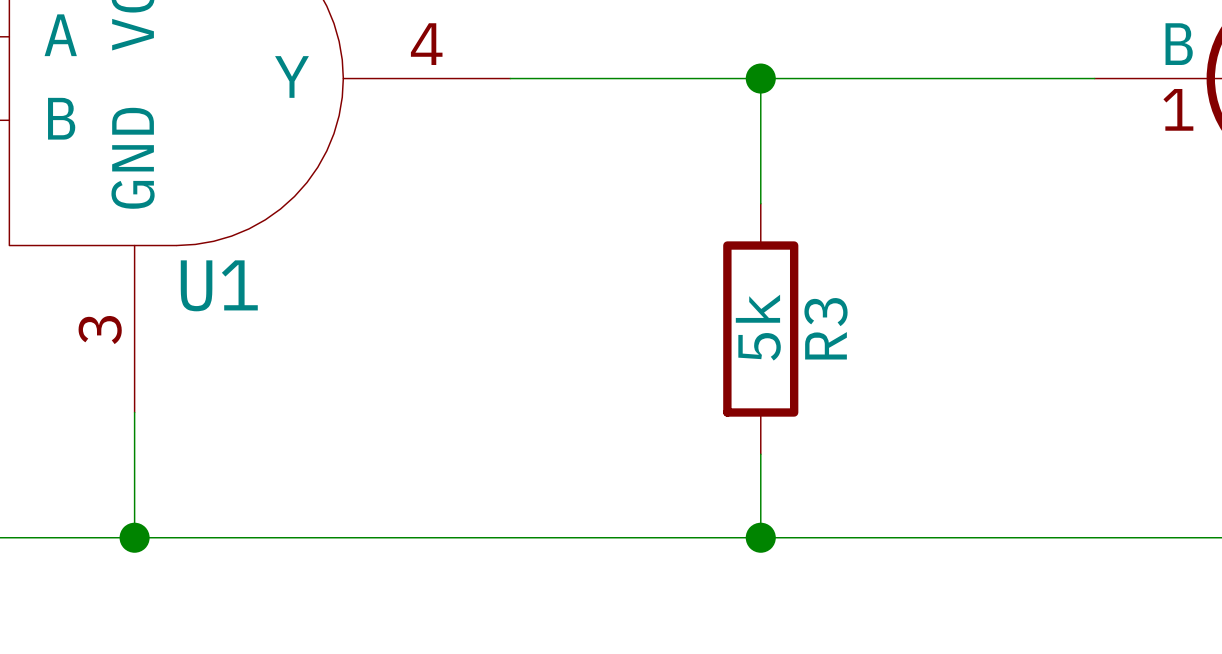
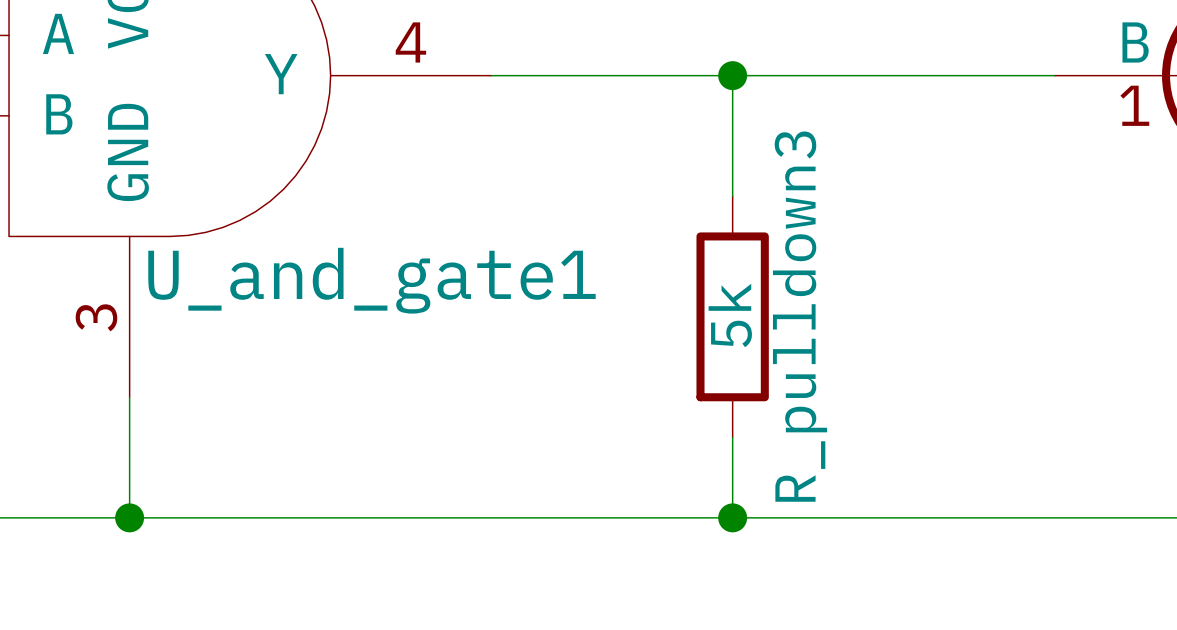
U1 name: U1 (219, 285) -> U_and_gate1 (371, 280)
R3 name: R3 (826, 328) -> R_pulldown3 (800, 316)

